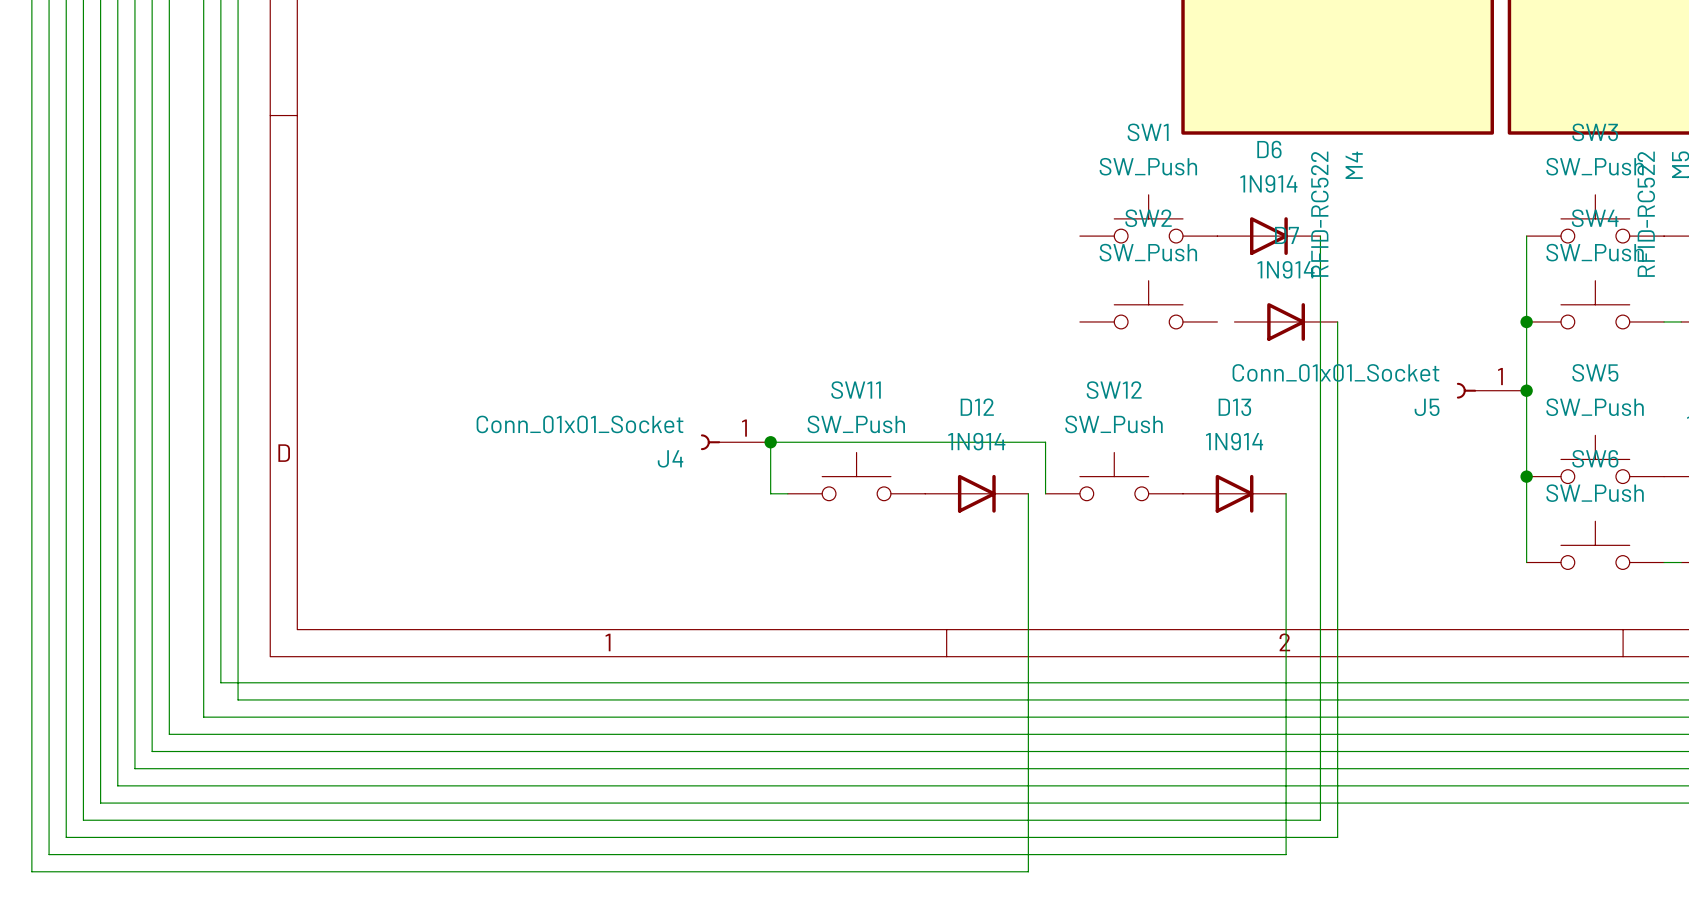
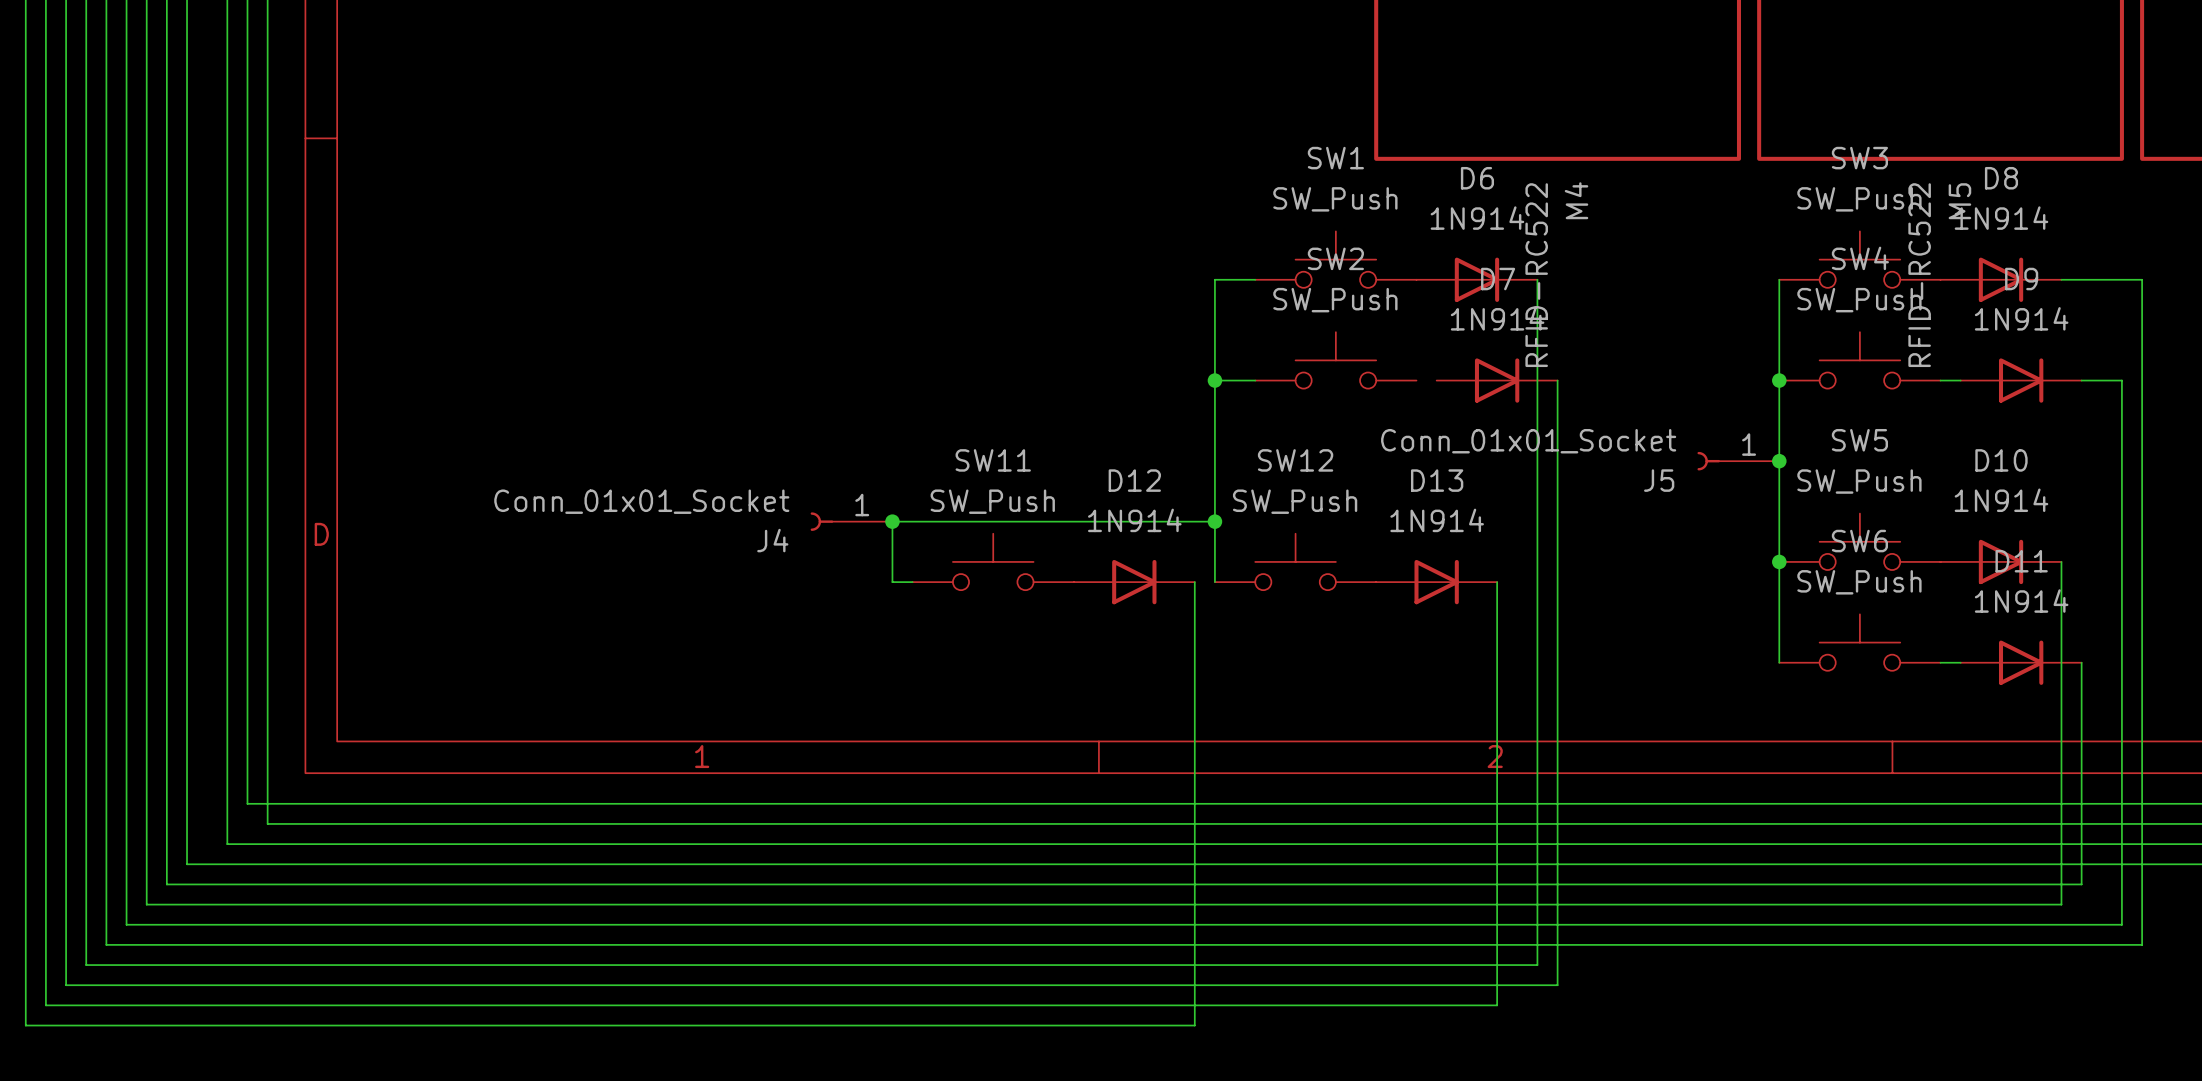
wire: none -> (1255, 279) (1214, 279) (1214, 521)
wire: none -> (1214, 380) (1255, 380)
junction: none -> (1214, 380)
junction: none -> (1214, 521)

